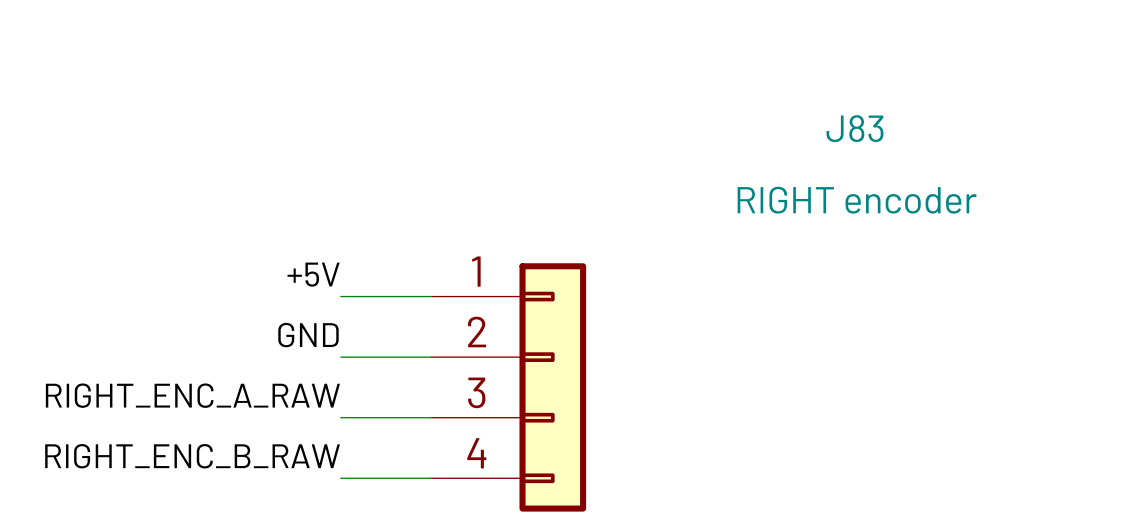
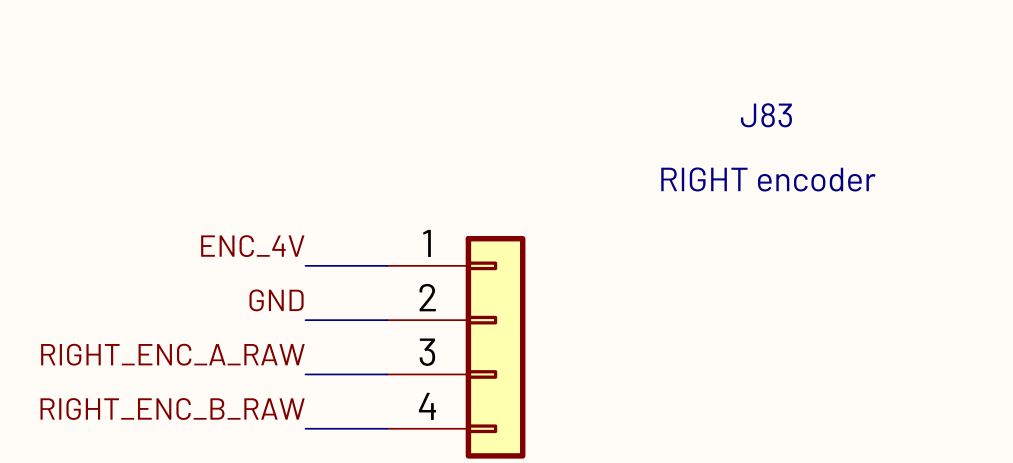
label: +5V (313, 274) -> ENC_4V (252, 246)

